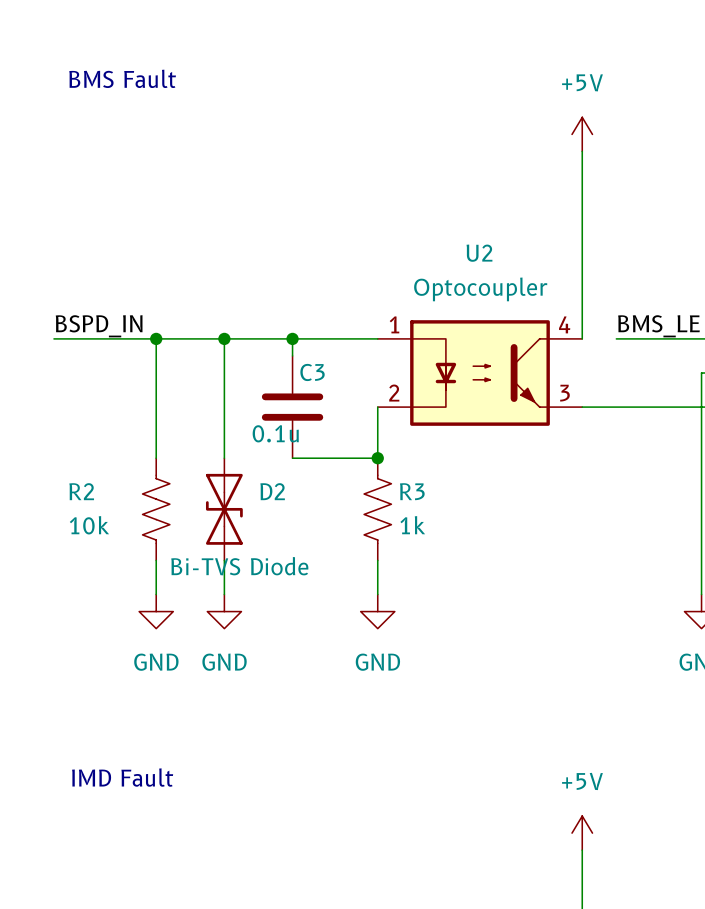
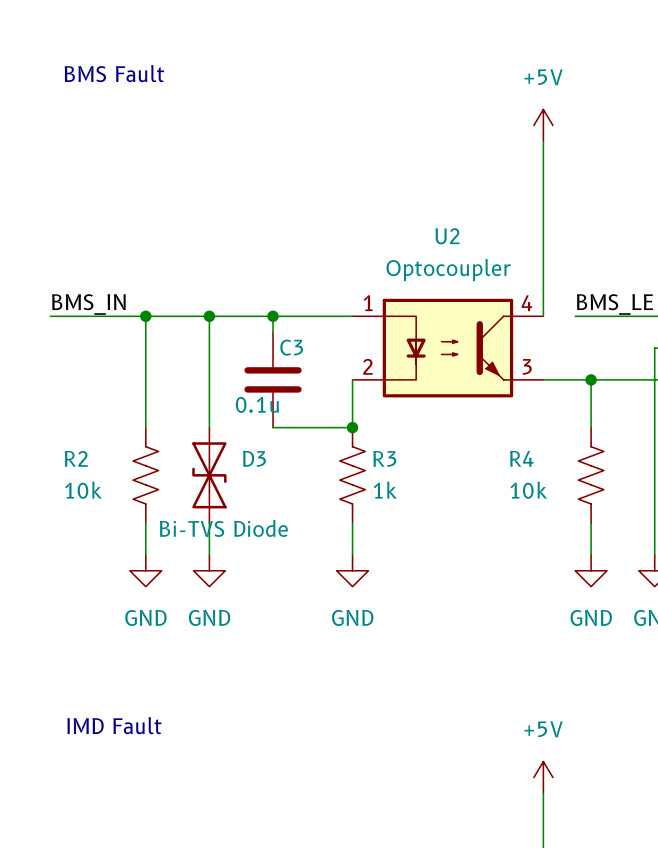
label: BSPD_IN (99, 326) -> BMS_IN (88, 304)
wire: none -> (591, 379) (591, 427)
junction: none -> (591, 379)
D2 name: D2 (272, 491) -> D3 (254, 458)
R4: none -> 10k (591, 475)
wire: none -> (591, 523) (591, 554)
power symbol: none -> GND (591, 570)

